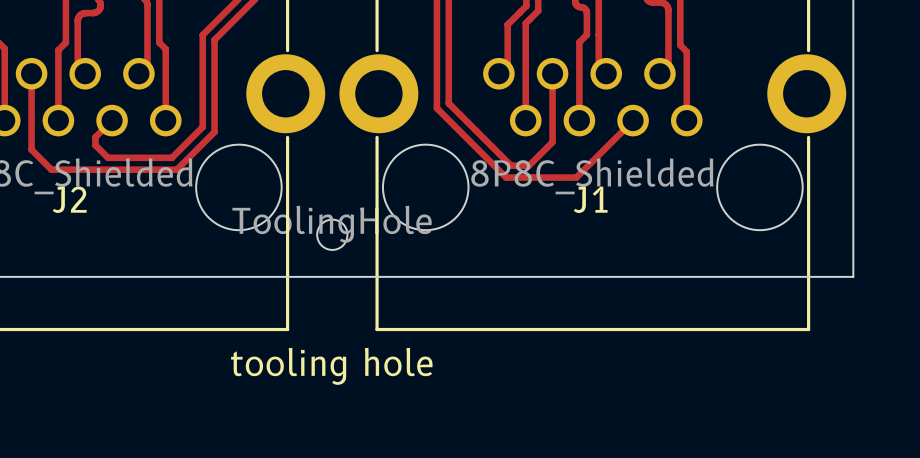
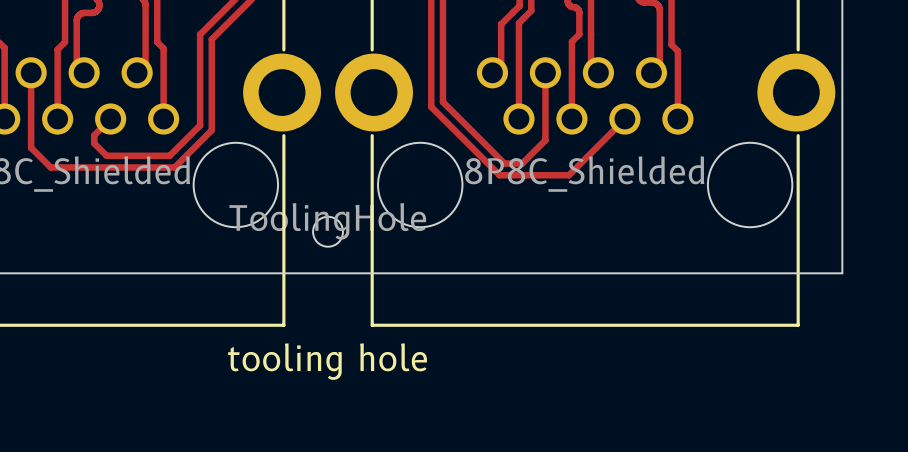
J2 name: J2 (69, 199) -> none
J1 name: J1 (590, 199) -> none

